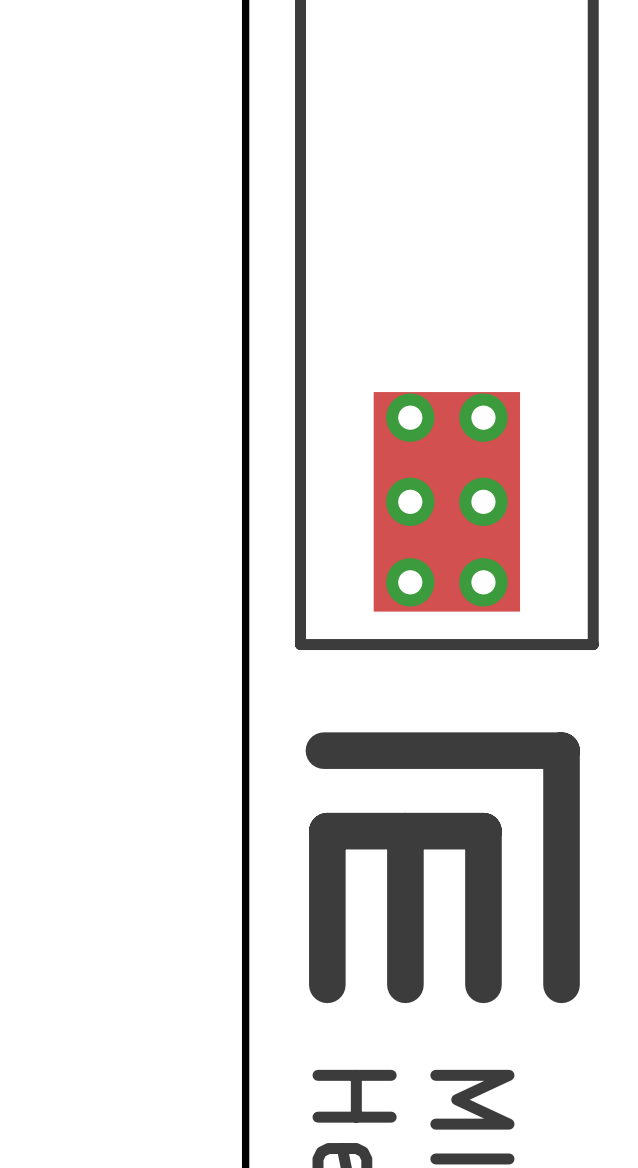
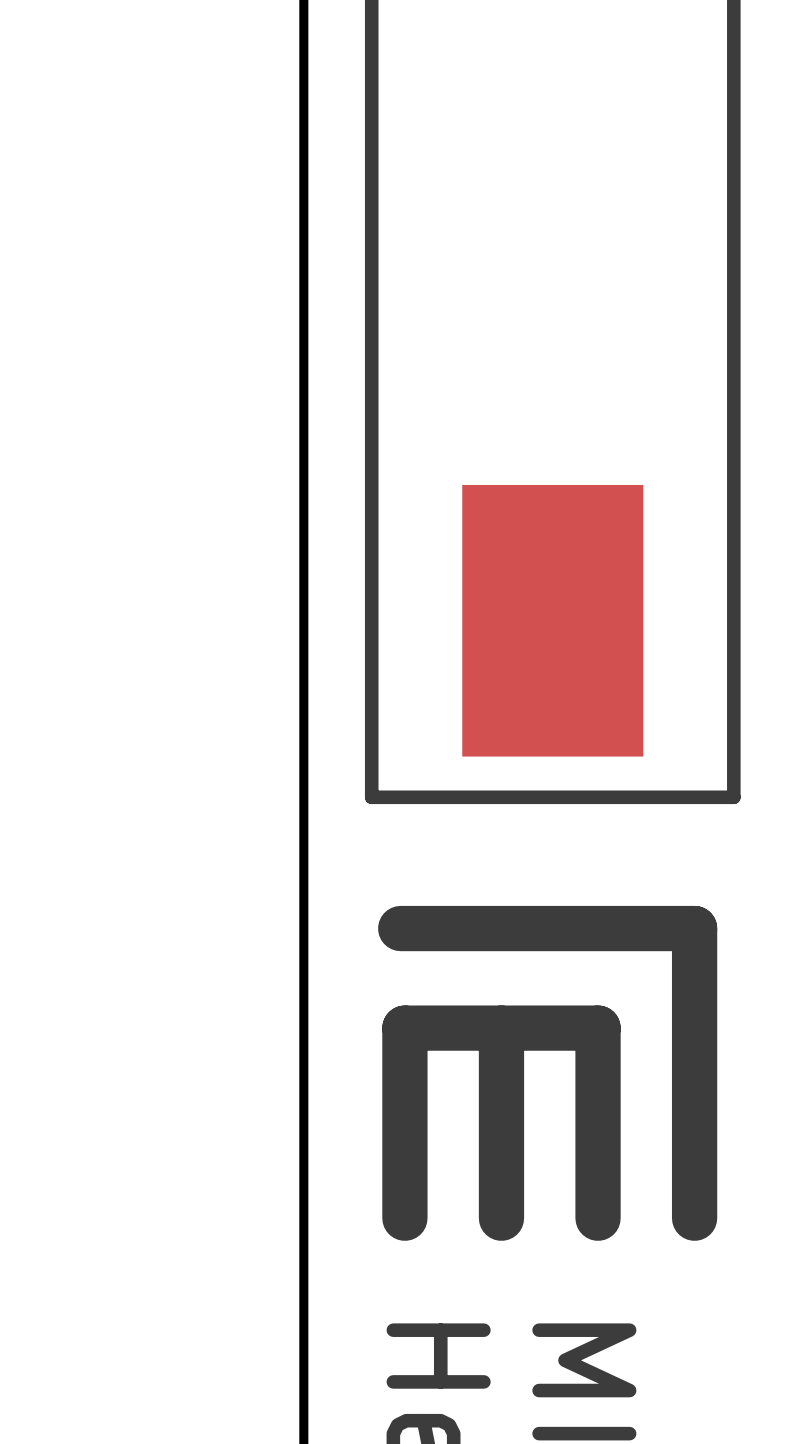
via: (410, 417) -> none
via: (483, 417) -> none
via: (410, 501) -> none
via: (483, 501) -> none
via: (410, 582) -> none
via: (483, 582) -> none

